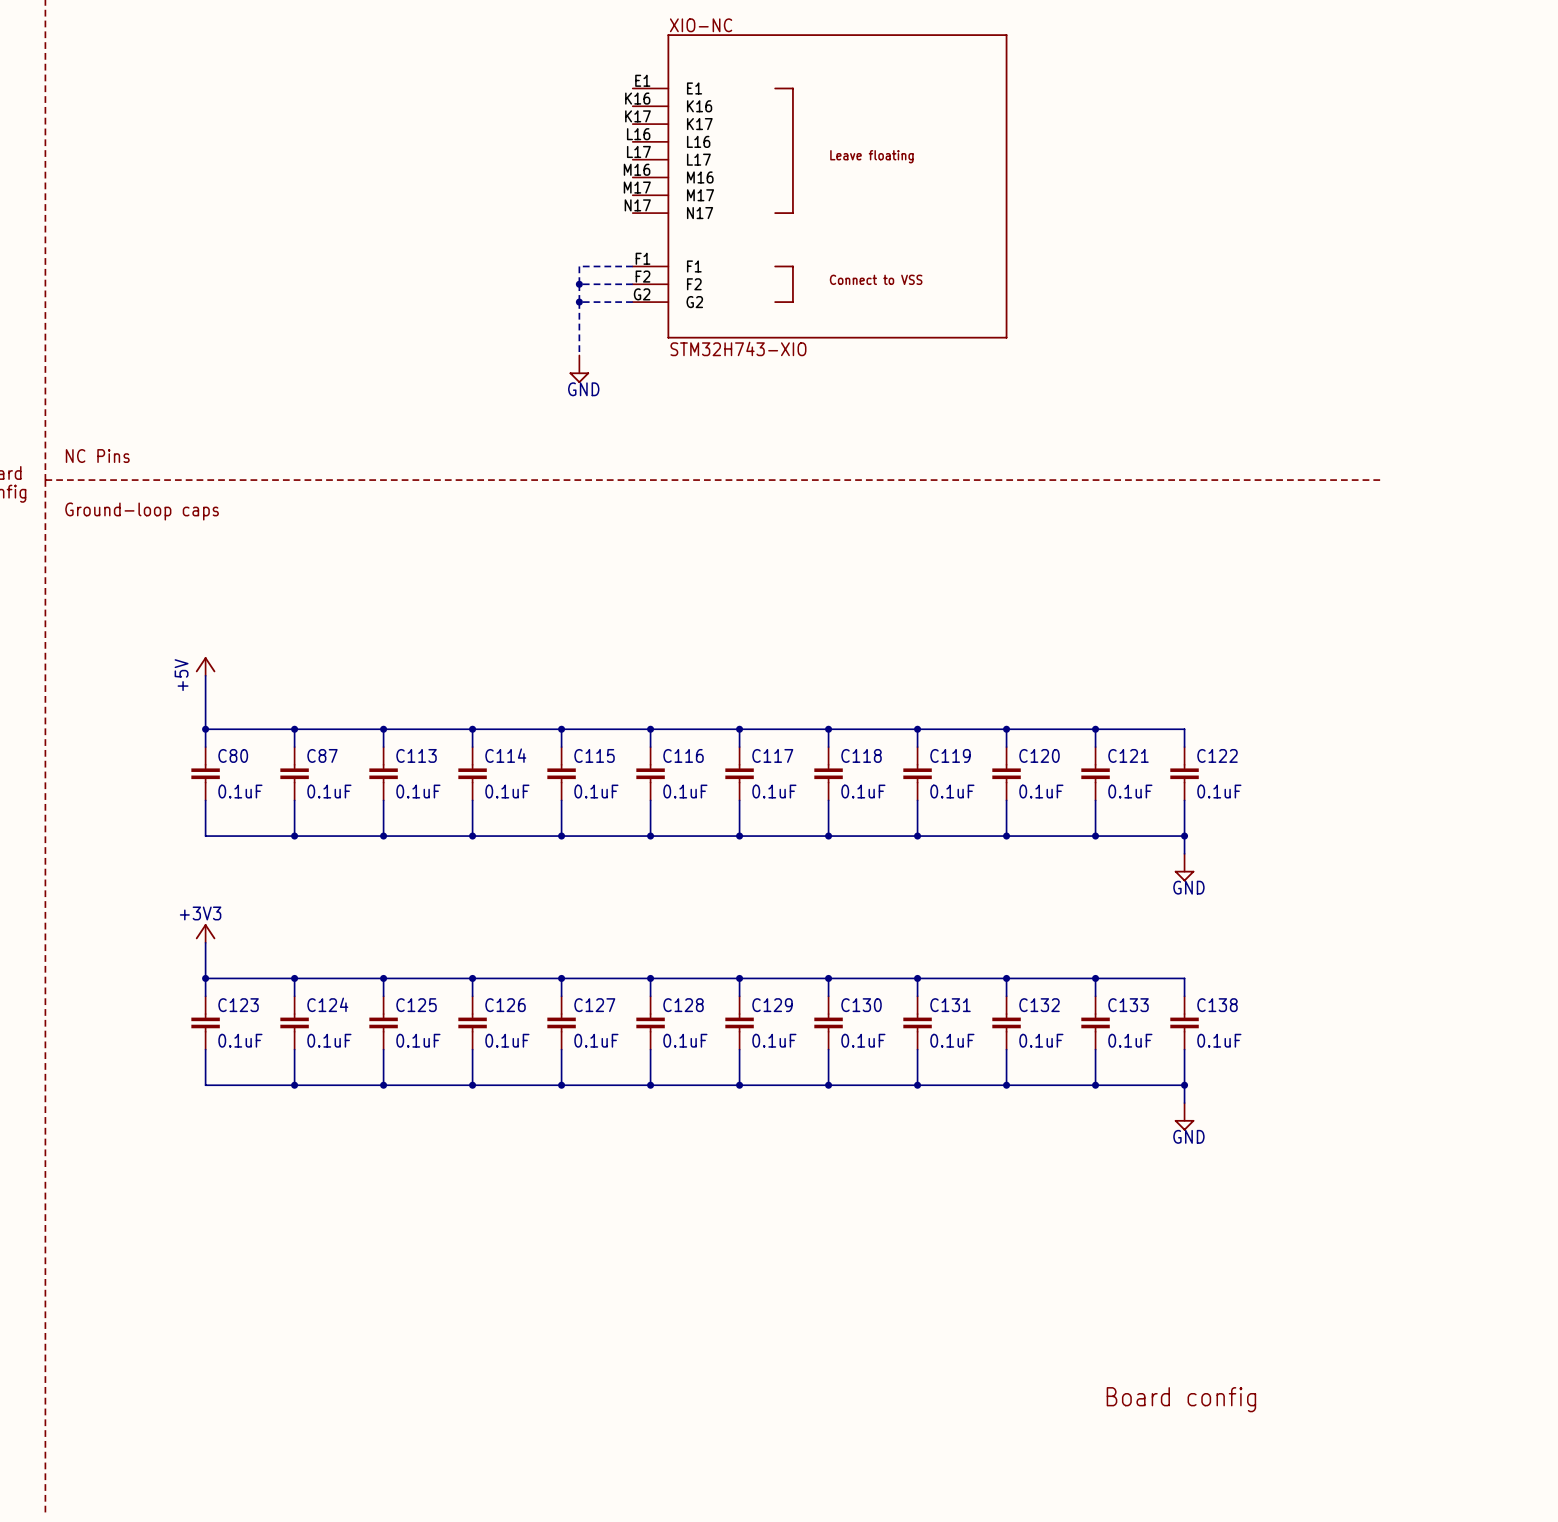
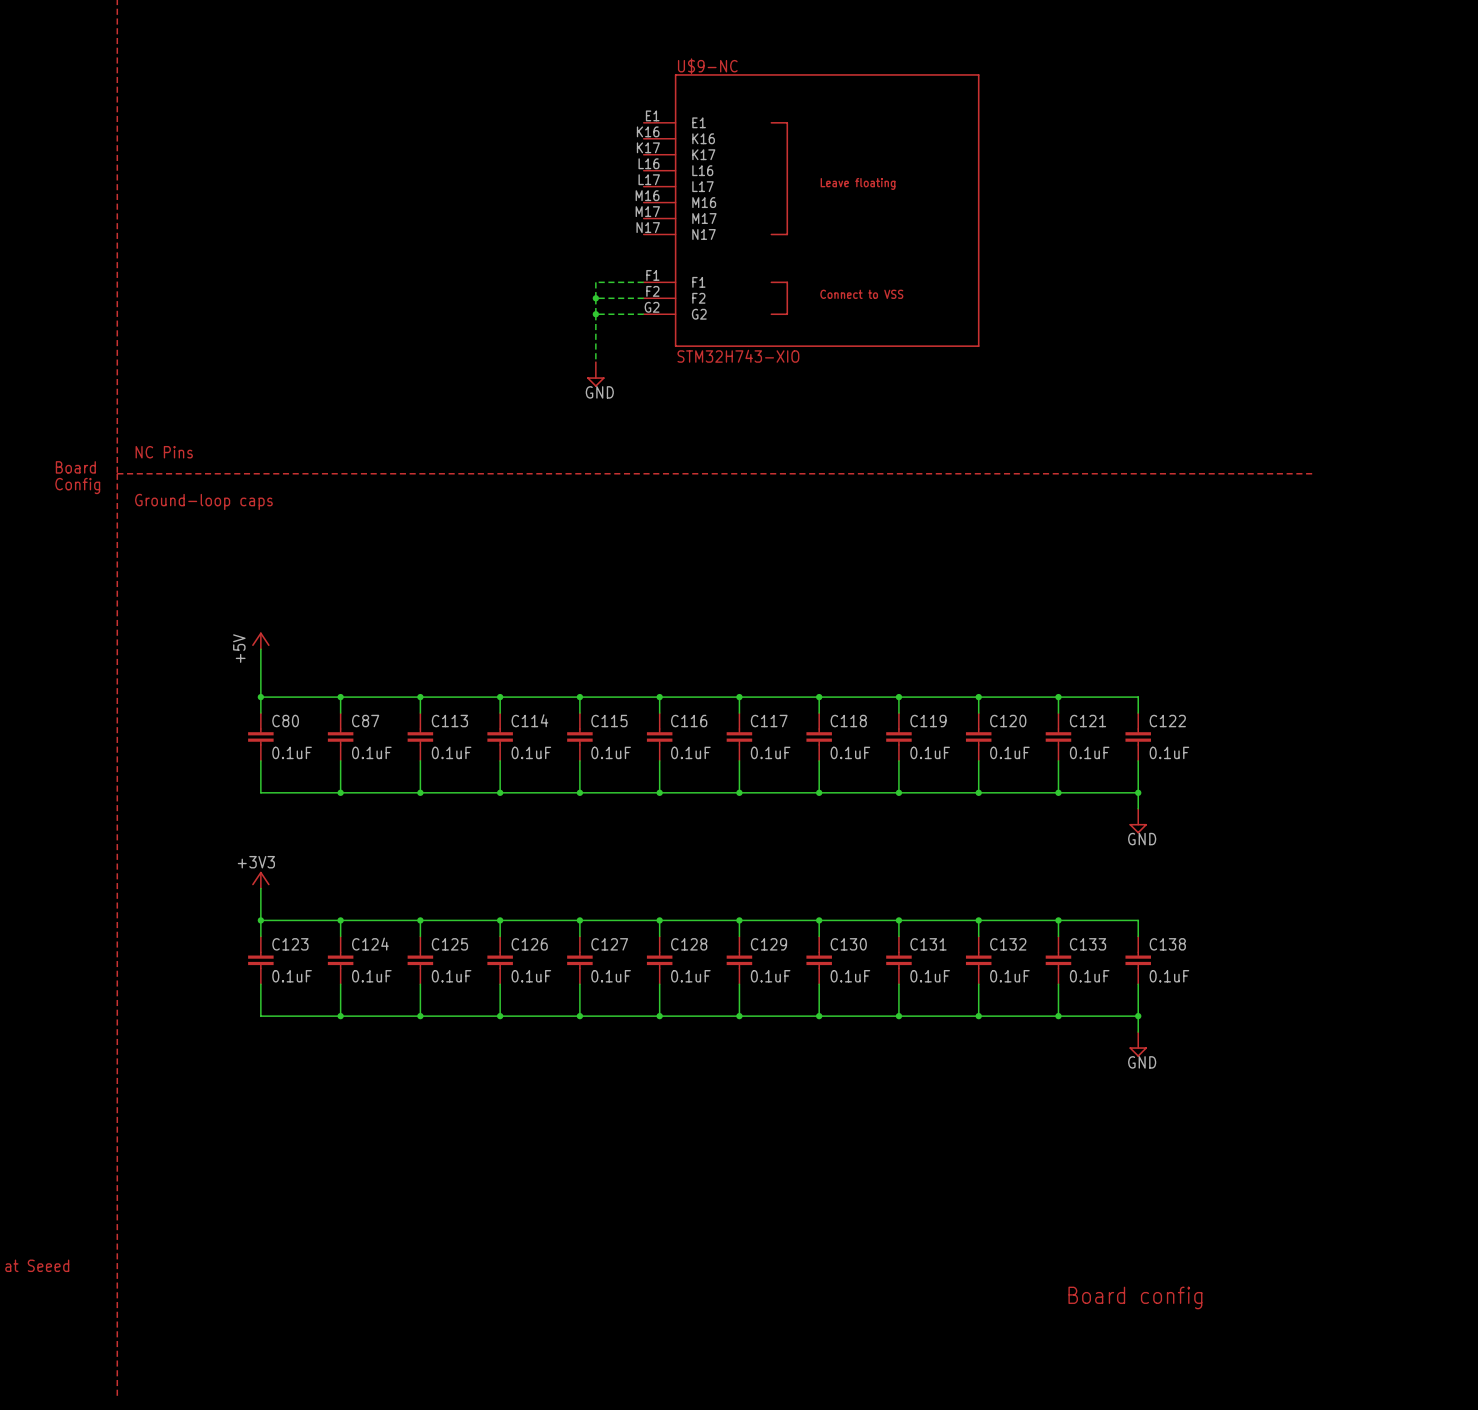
XIO-NC name: XIO-NC (701, 25) -> U$9-NC (707, 66)

